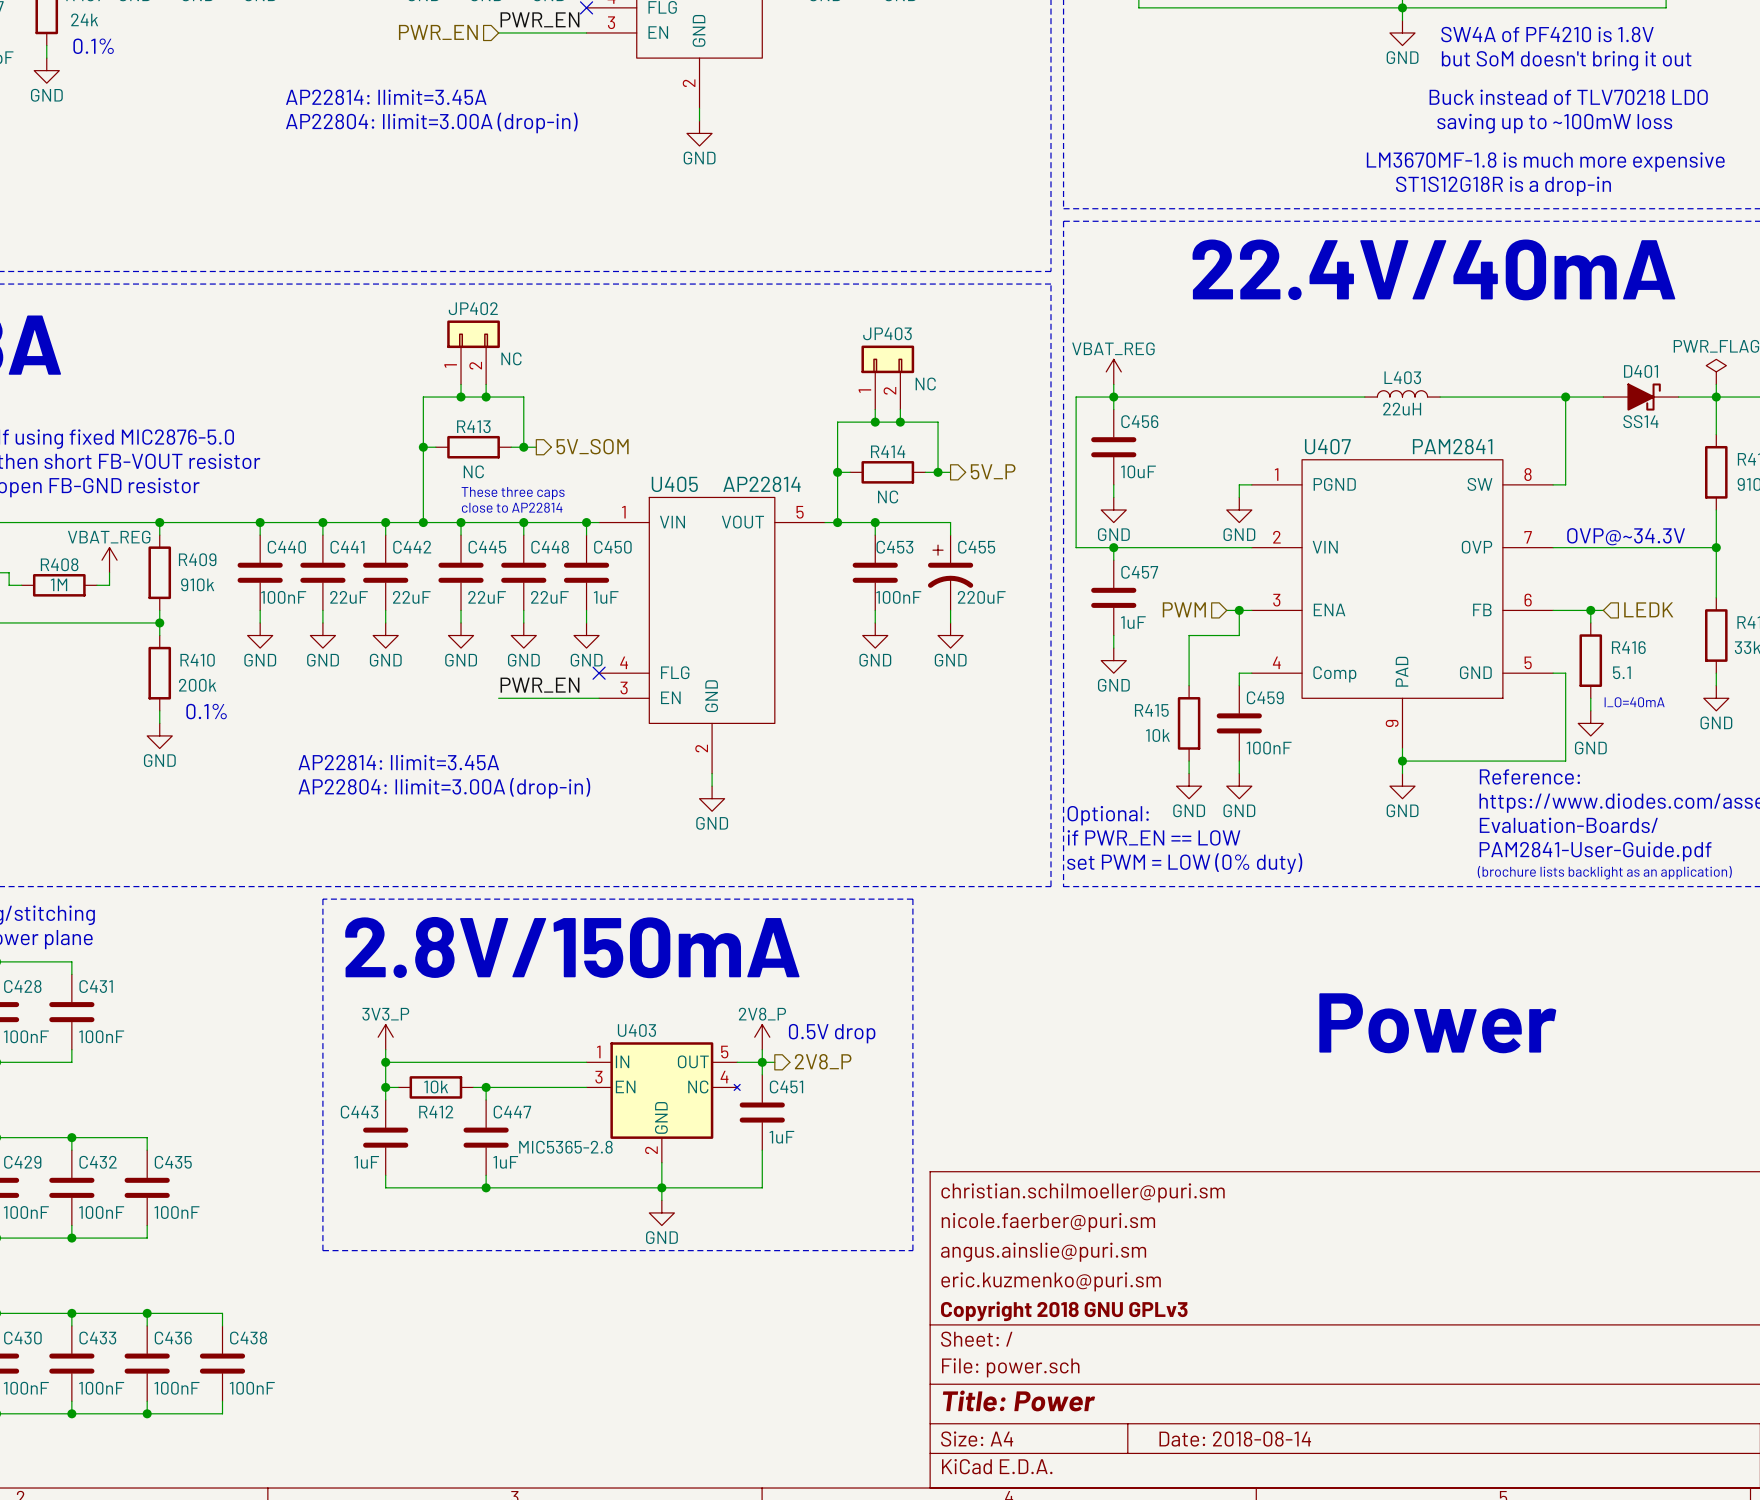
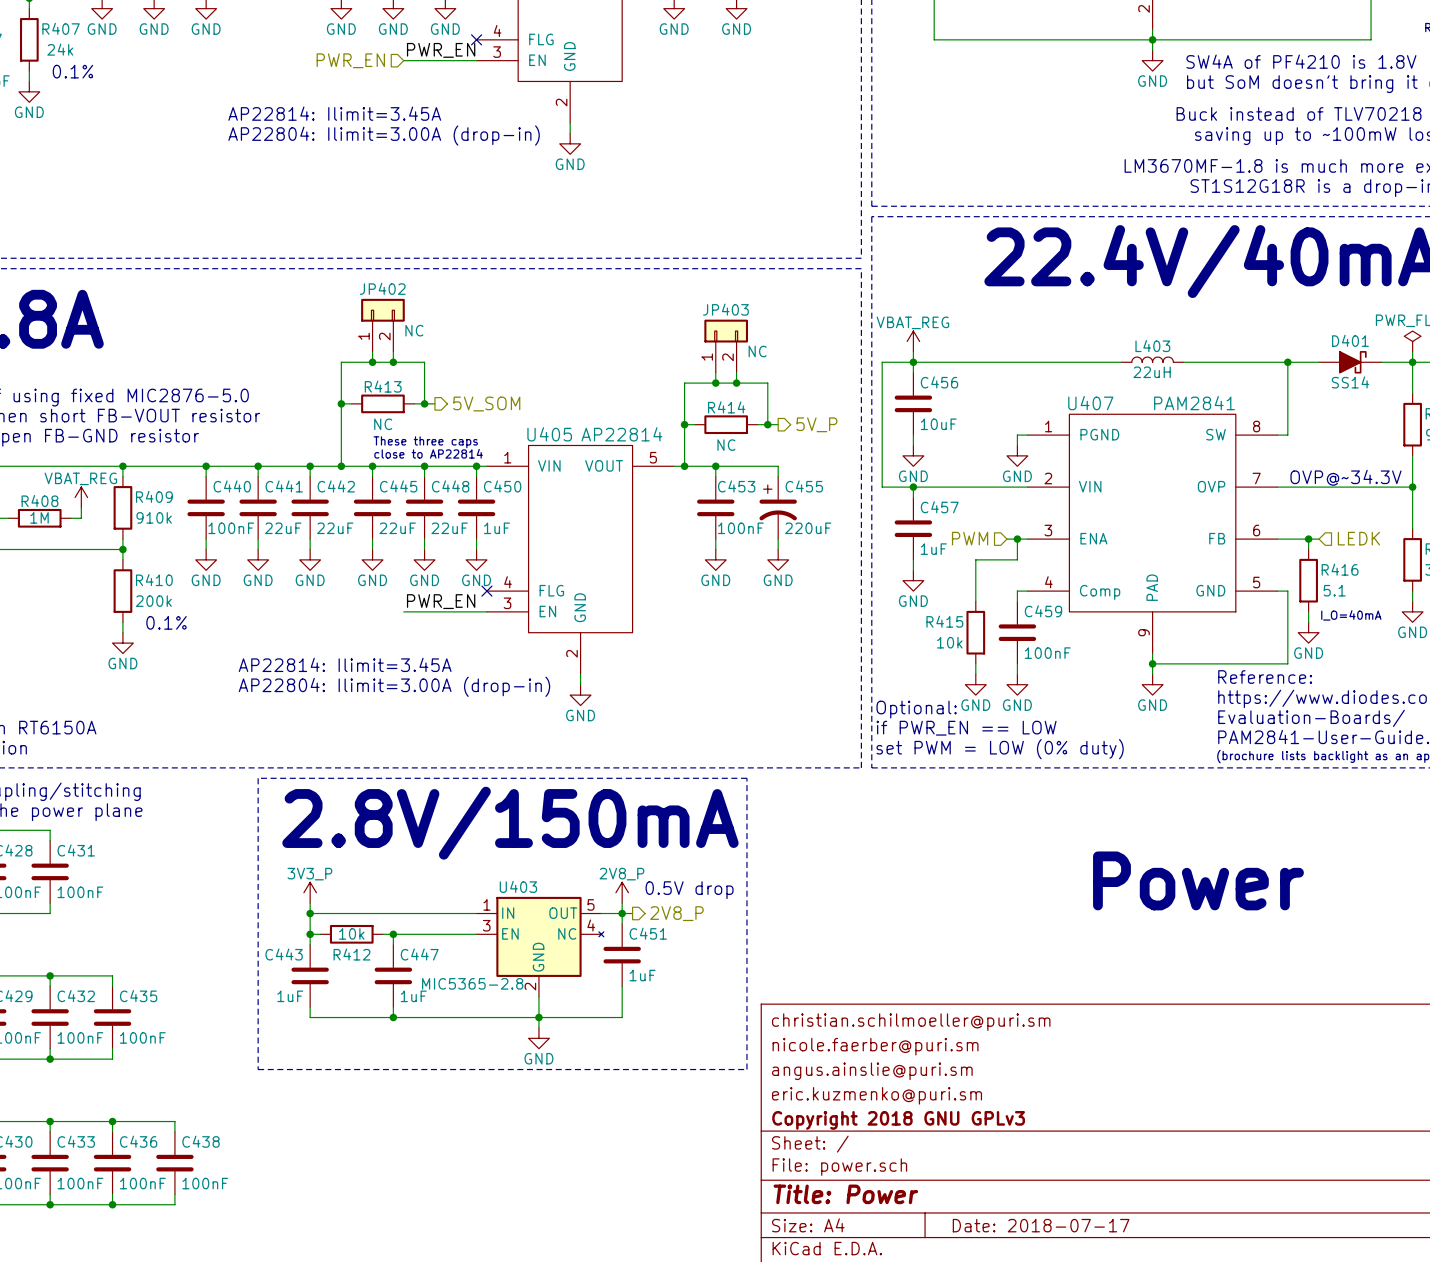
title block: Date: 2018-08-14 (1235, 1439) -> Date: 2018-07-17 (1041, 1225)

